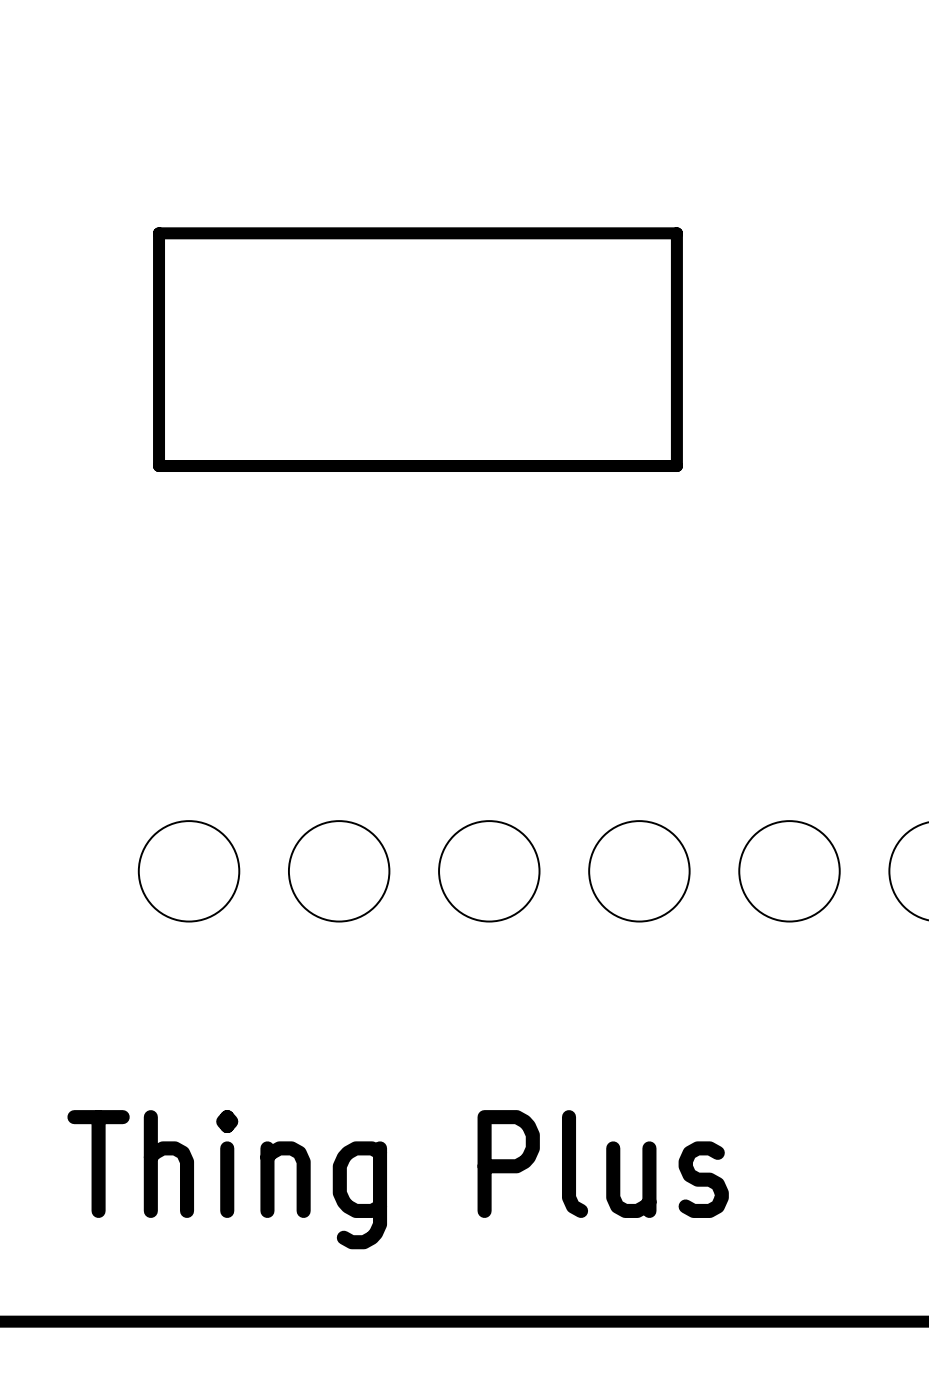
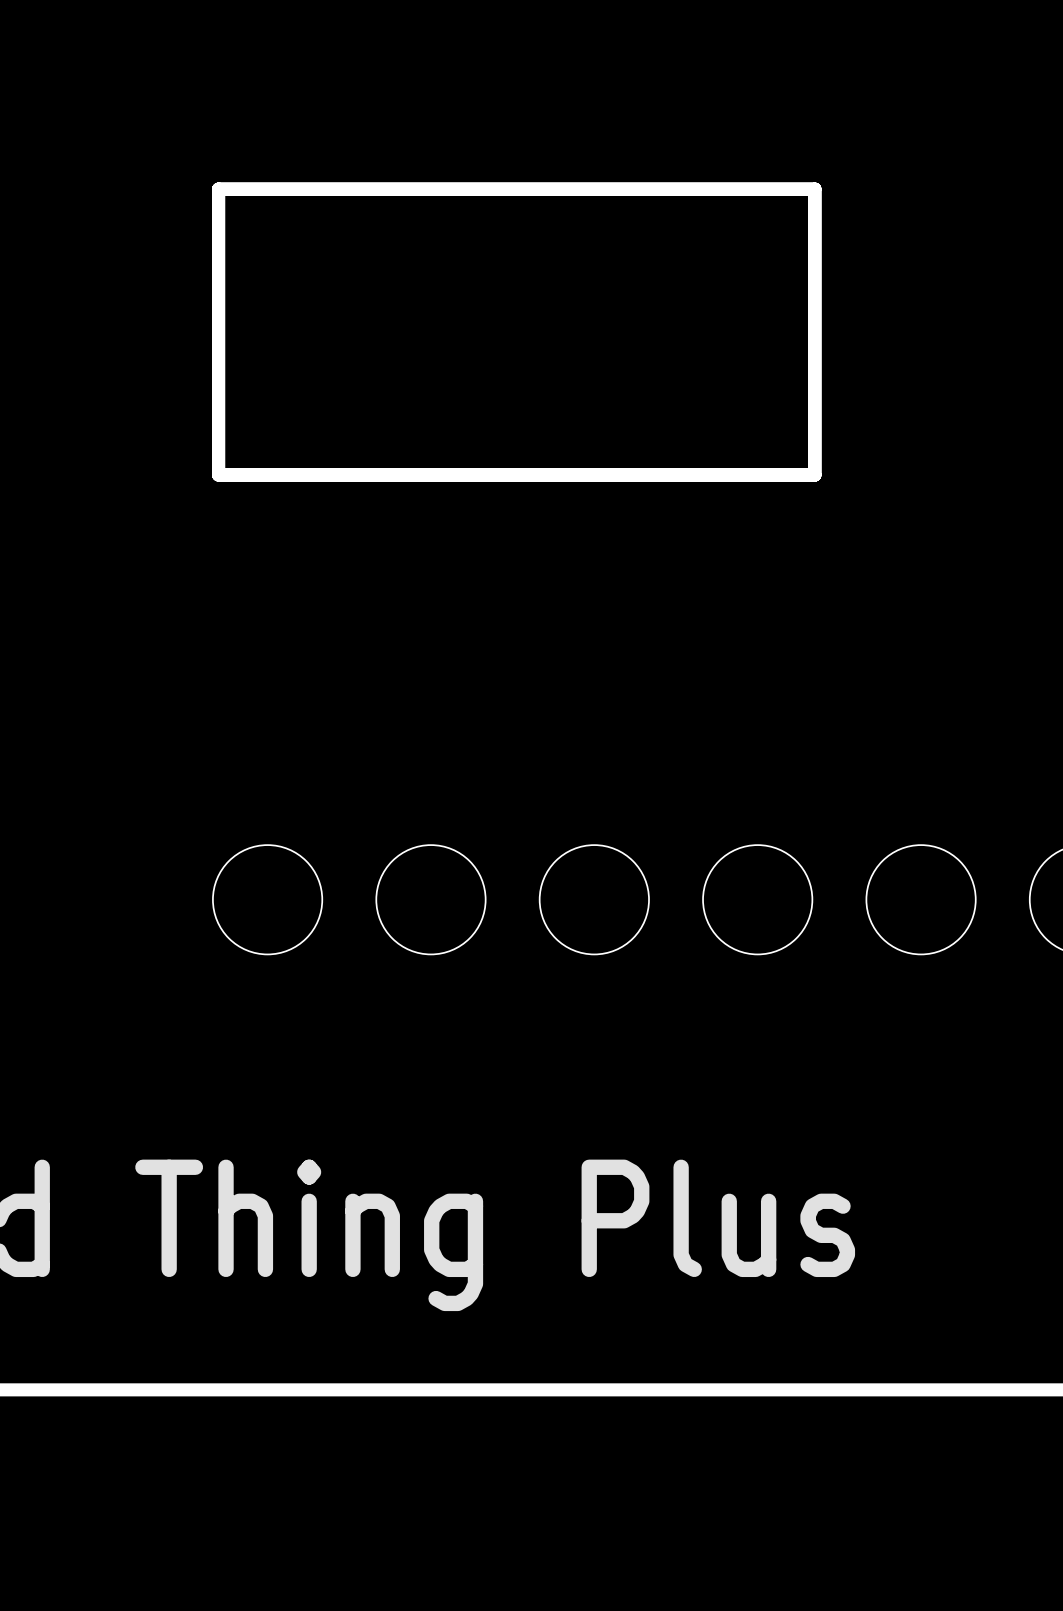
board edge: (159, 233) (676, 233) (676, 466) (159, 466) (159, 233) -> (218, 189) (218, 475) (814, 475) (814, 189) (218, 189)

